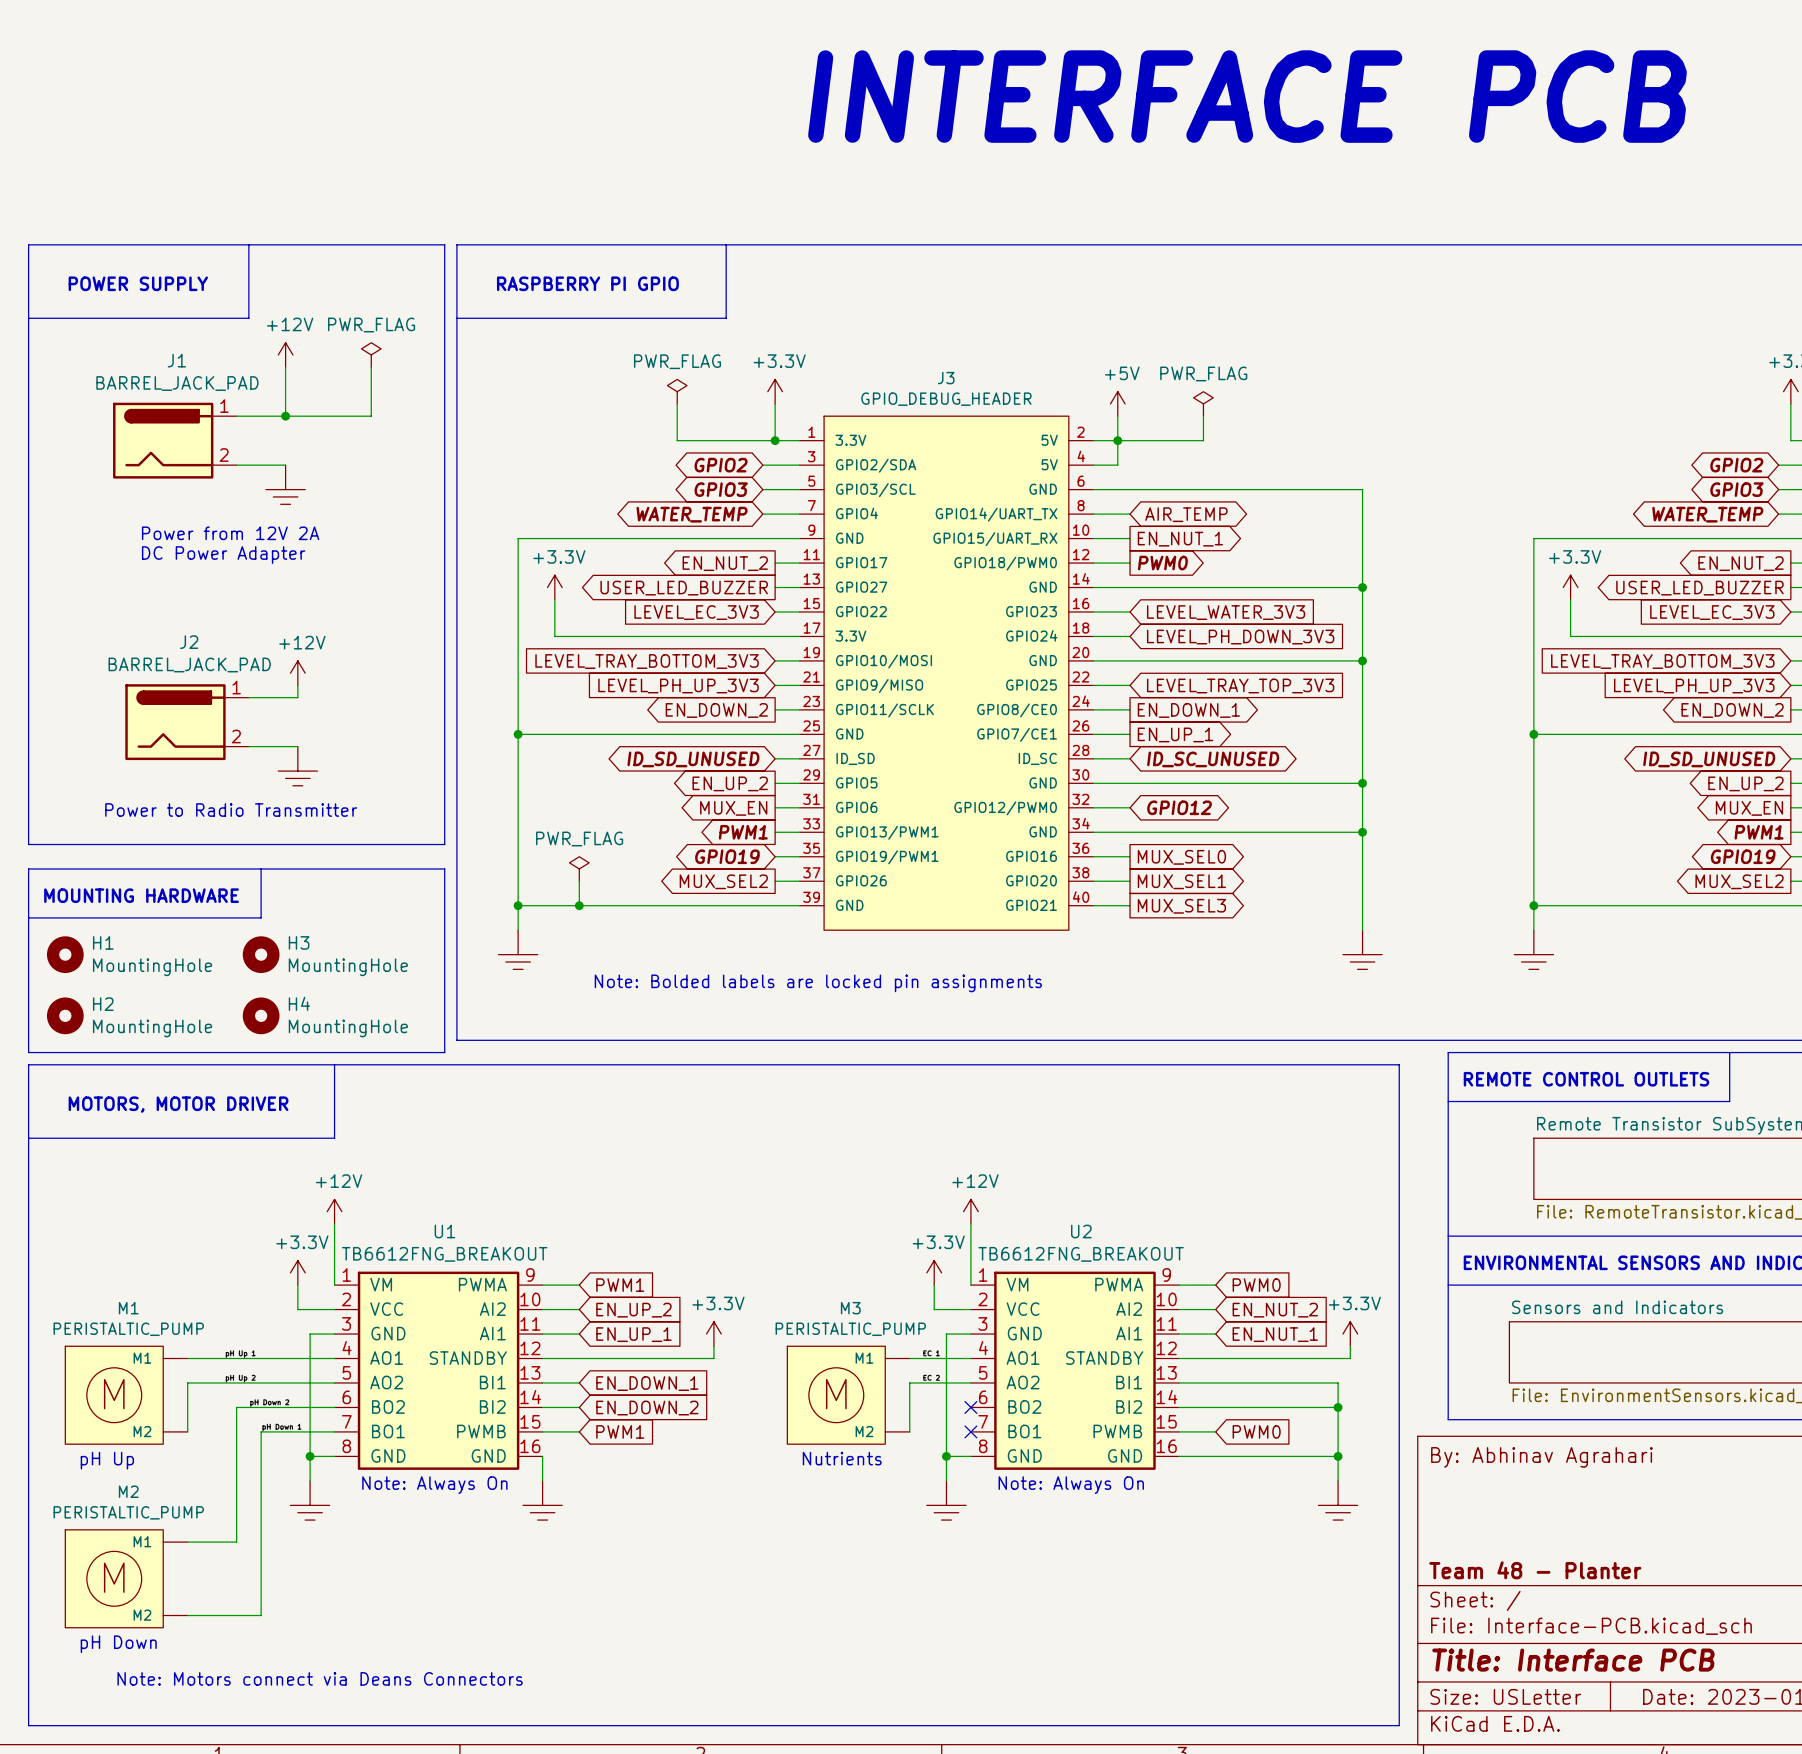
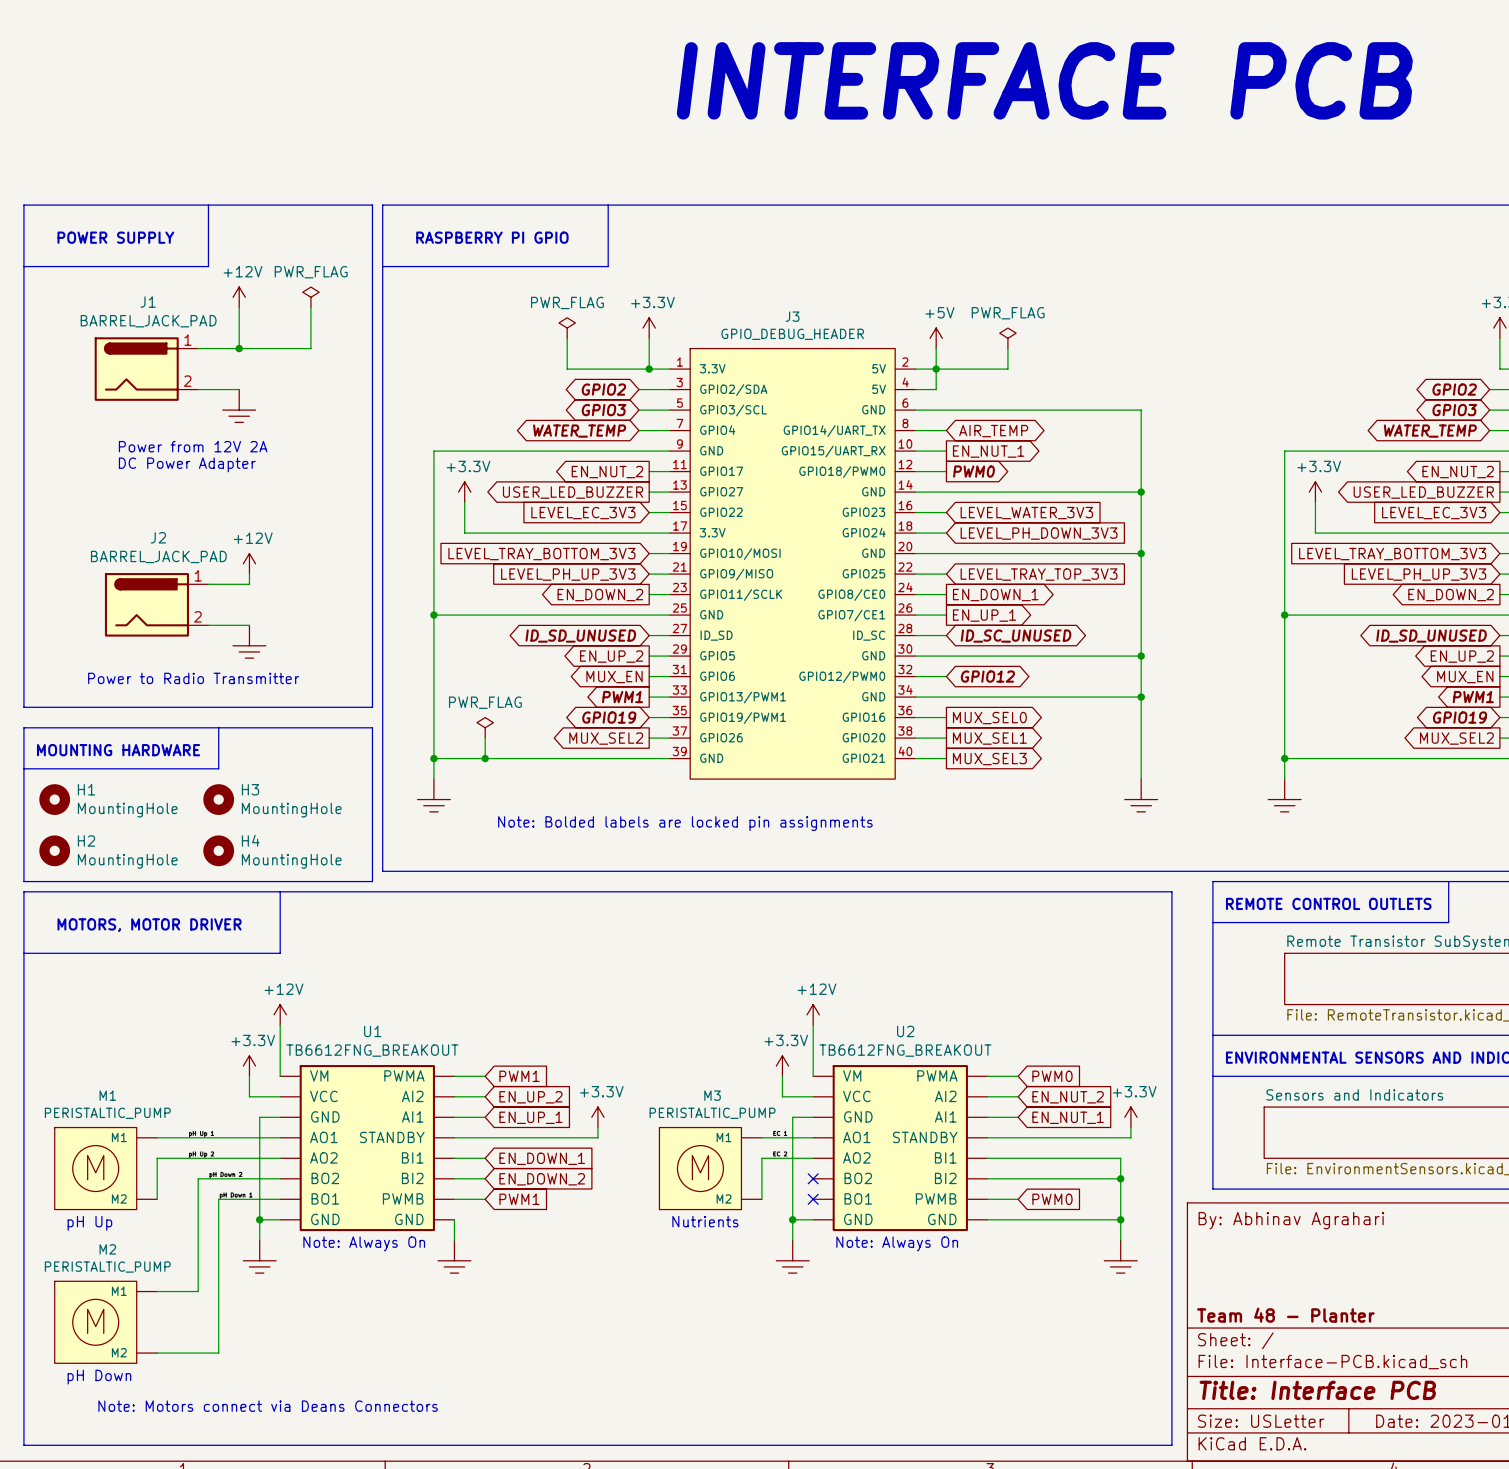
U1 symbol: [334, 1271, 543, 1470] -> [280, 1065, 455, 1232]
U2 symbol: [970, 1271, 1179, 1470] -> [813, 1065, 988, 1232]

